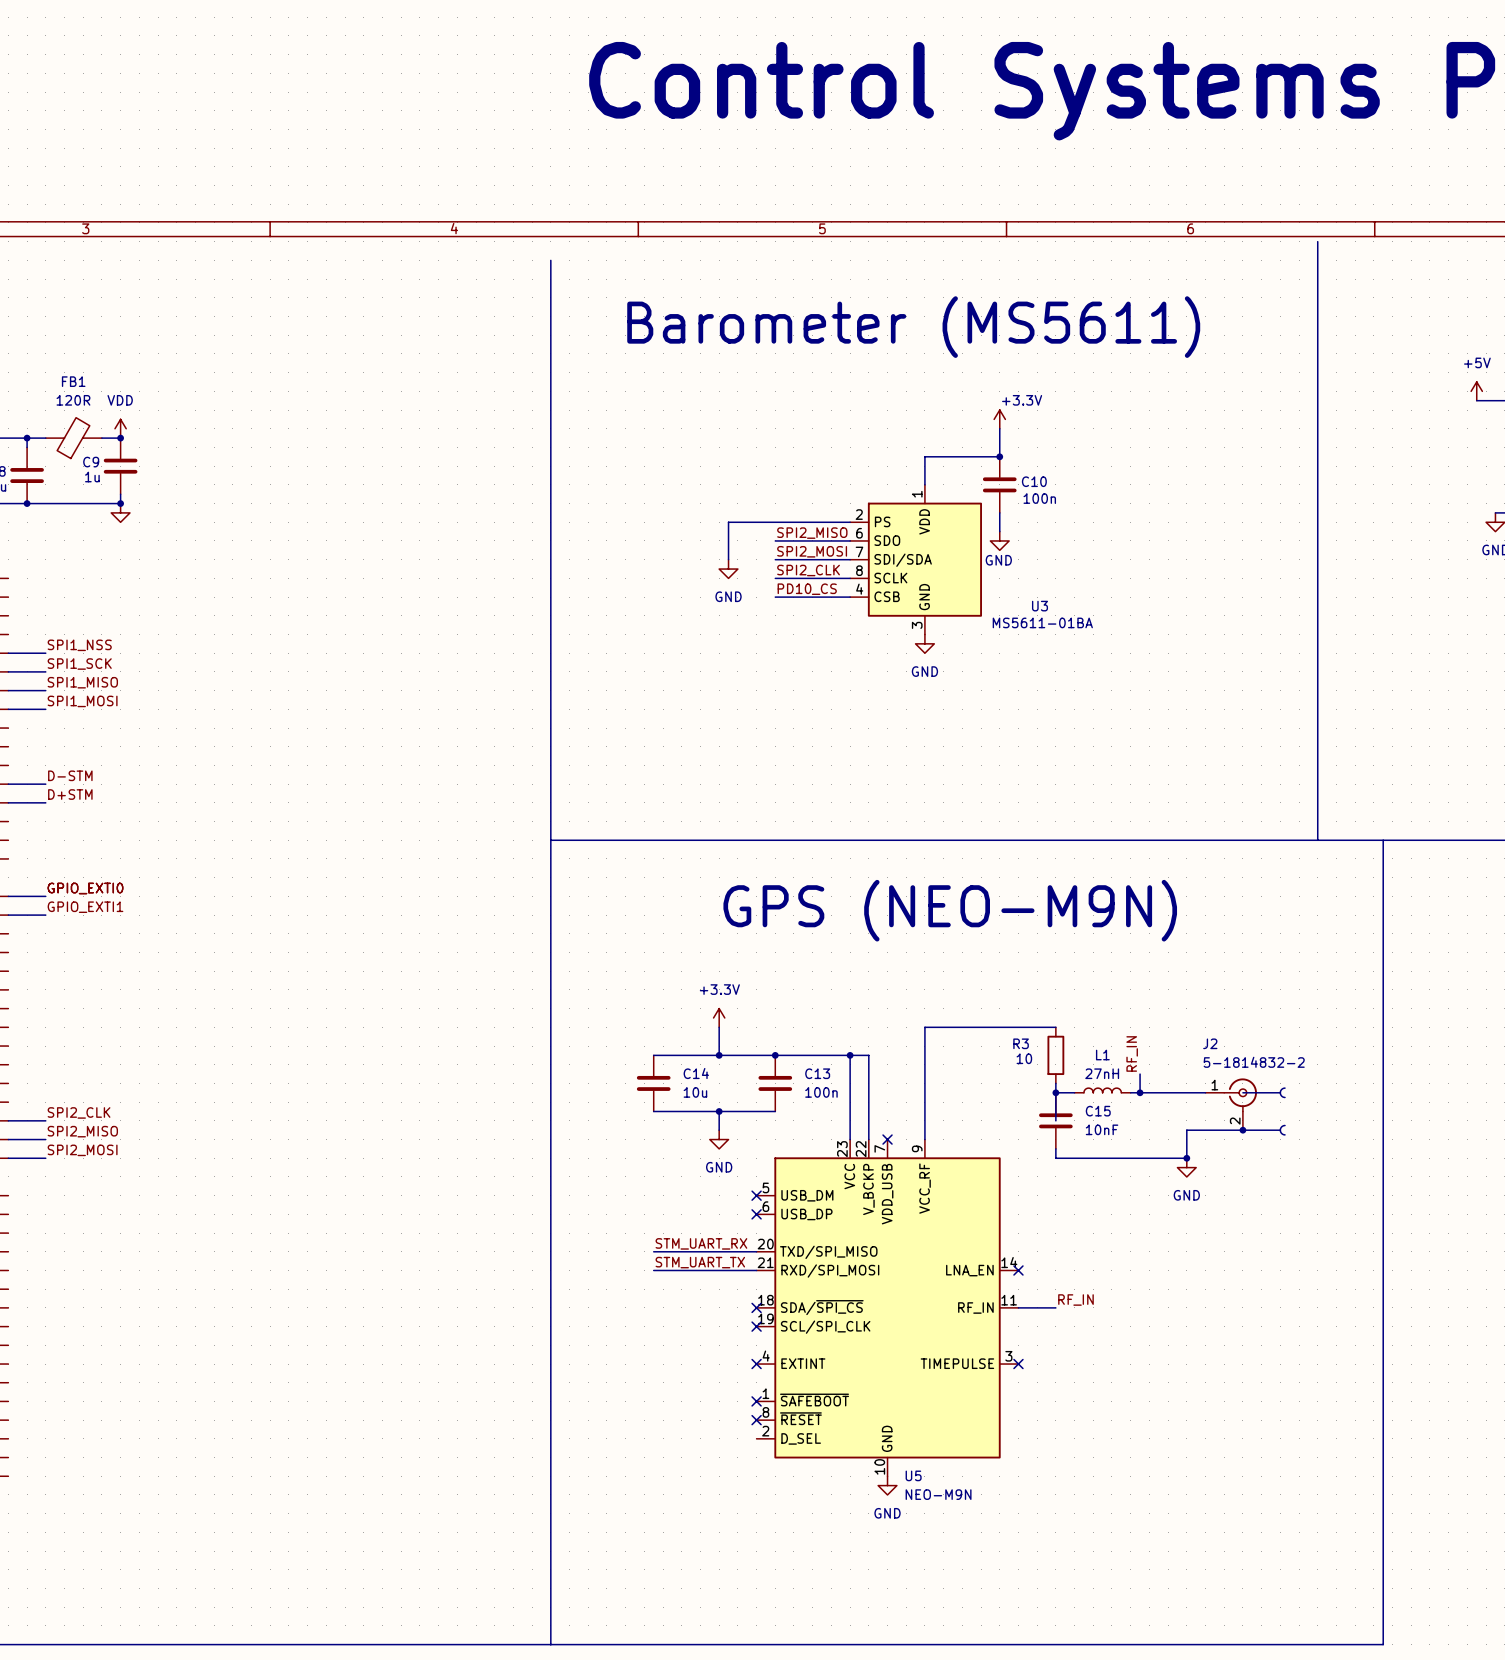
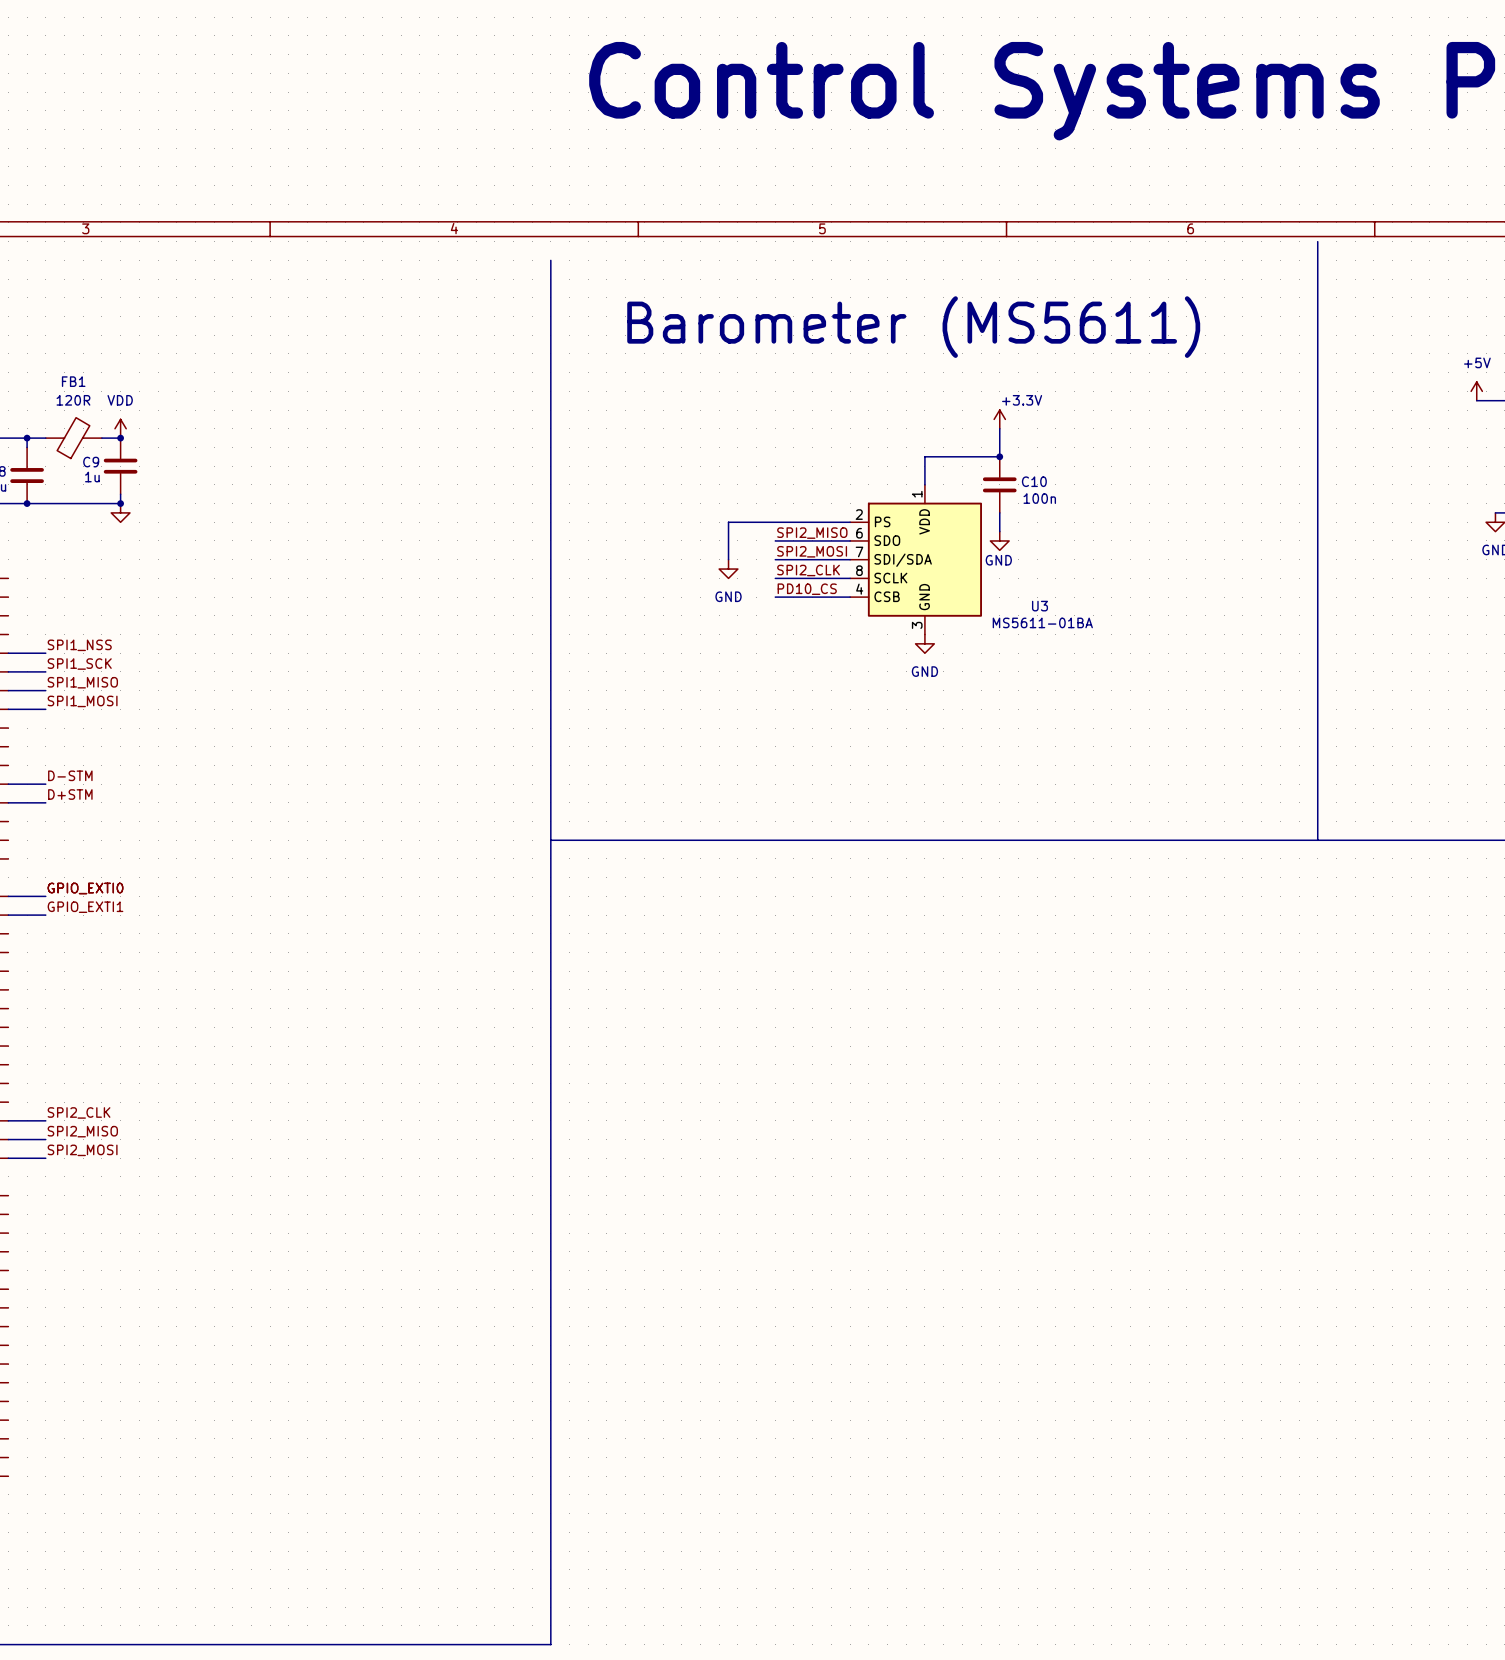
line: (1383, 840) (1383, 1644) (550, 1644) -> none
text: GPS (NEO-M9N) (950, 910) -> none
power symbol: +3.3V (719, 1017) -> none
wire: (719, 1027) (719, 1055) -> none
wire: (1055, 1027) (924, 1027) (924, 1139) -> none
label: RF_IN (1132, 1053) -> none
wire: (653, 1055) (868, 1055) (868, 1139) -> none
junction: (719, 1055) -> none
junction: (775, 1055) -> none
wire: (850, 1055) (850, 1139) -> none
junction: (850, 1055) -> none
R3: 10 (1055, 1055) -> none
wire: (1140, 1074) (1140, 1092) -> none
C14: 10u (653, 1083) -> none
C13: 100n (775, 1083) -> none
wire: (1055, 1083) (1055, 1120) -> none
line: (1285, 1088) (1280, 1092) (1285, 1097) -> none
L1: 27nH (1102, 1090) -> none
wire: (1055, 1092) (1074, 1092) -> none
junction: (1055, 1092) -> none
wire: (1130, 1092) (1205, 1092) -> none
junction: (1140, 1092) -> none
wire: (1242, 1092) (1280, 1092) -> none
J2: 5-1814832-2 (1231, 1104) -> none
wire: (653, 1111) (775, 1111) -> none
wire: (719, 1111) (719, 1130) -> none
junction: (719, 1111) -> none
C15: 10nF (1055, 1120) -> none
line: (1285, 1125) (1280, 1130) (1285, 1134) -> none
junction: (1242, 1130) -> none
wire: (1280, 1130) (1186, 1130) (1186, 1158) (1055, 1158) (1055, 1148) -> none
power symbol: GND (719, 1139) -> none
no-connect mark: (887, 1139) -> none
junction: (1186, 1158) -> none
power symbol: GND (1186, 1167) -> none
no-connect mark: (756, 1195) -> none
no-connect mark: (756, 1214) -> none
label: STM_UART_RX (701, 1243) -> none
wire: (653, 1251) (756, 1251) -> none
label: STM_UART_TX (700, 1262) -> none
wire: (653, 1270) (756, 1270) -> none
no-connect mark: (1018, 1270) -> none
label: RF_IN (1075, 1300) -> none
no-connect mark: (756, 1307) -> none
U5: NEO-M9N (887, 1307) -> none
wire: (1018, 1307) (1055, 1307) -> none
no-connect mark: (756, 1326) -> none
no-connect mark: (756, 1364) -> none
no-connect mark: (1018, 1364) -> none
no-connect mark: (756, 1401) -> none
no-connect mark: (756, 1420) -> none
power symbol: GND (887, 1485) -> none

